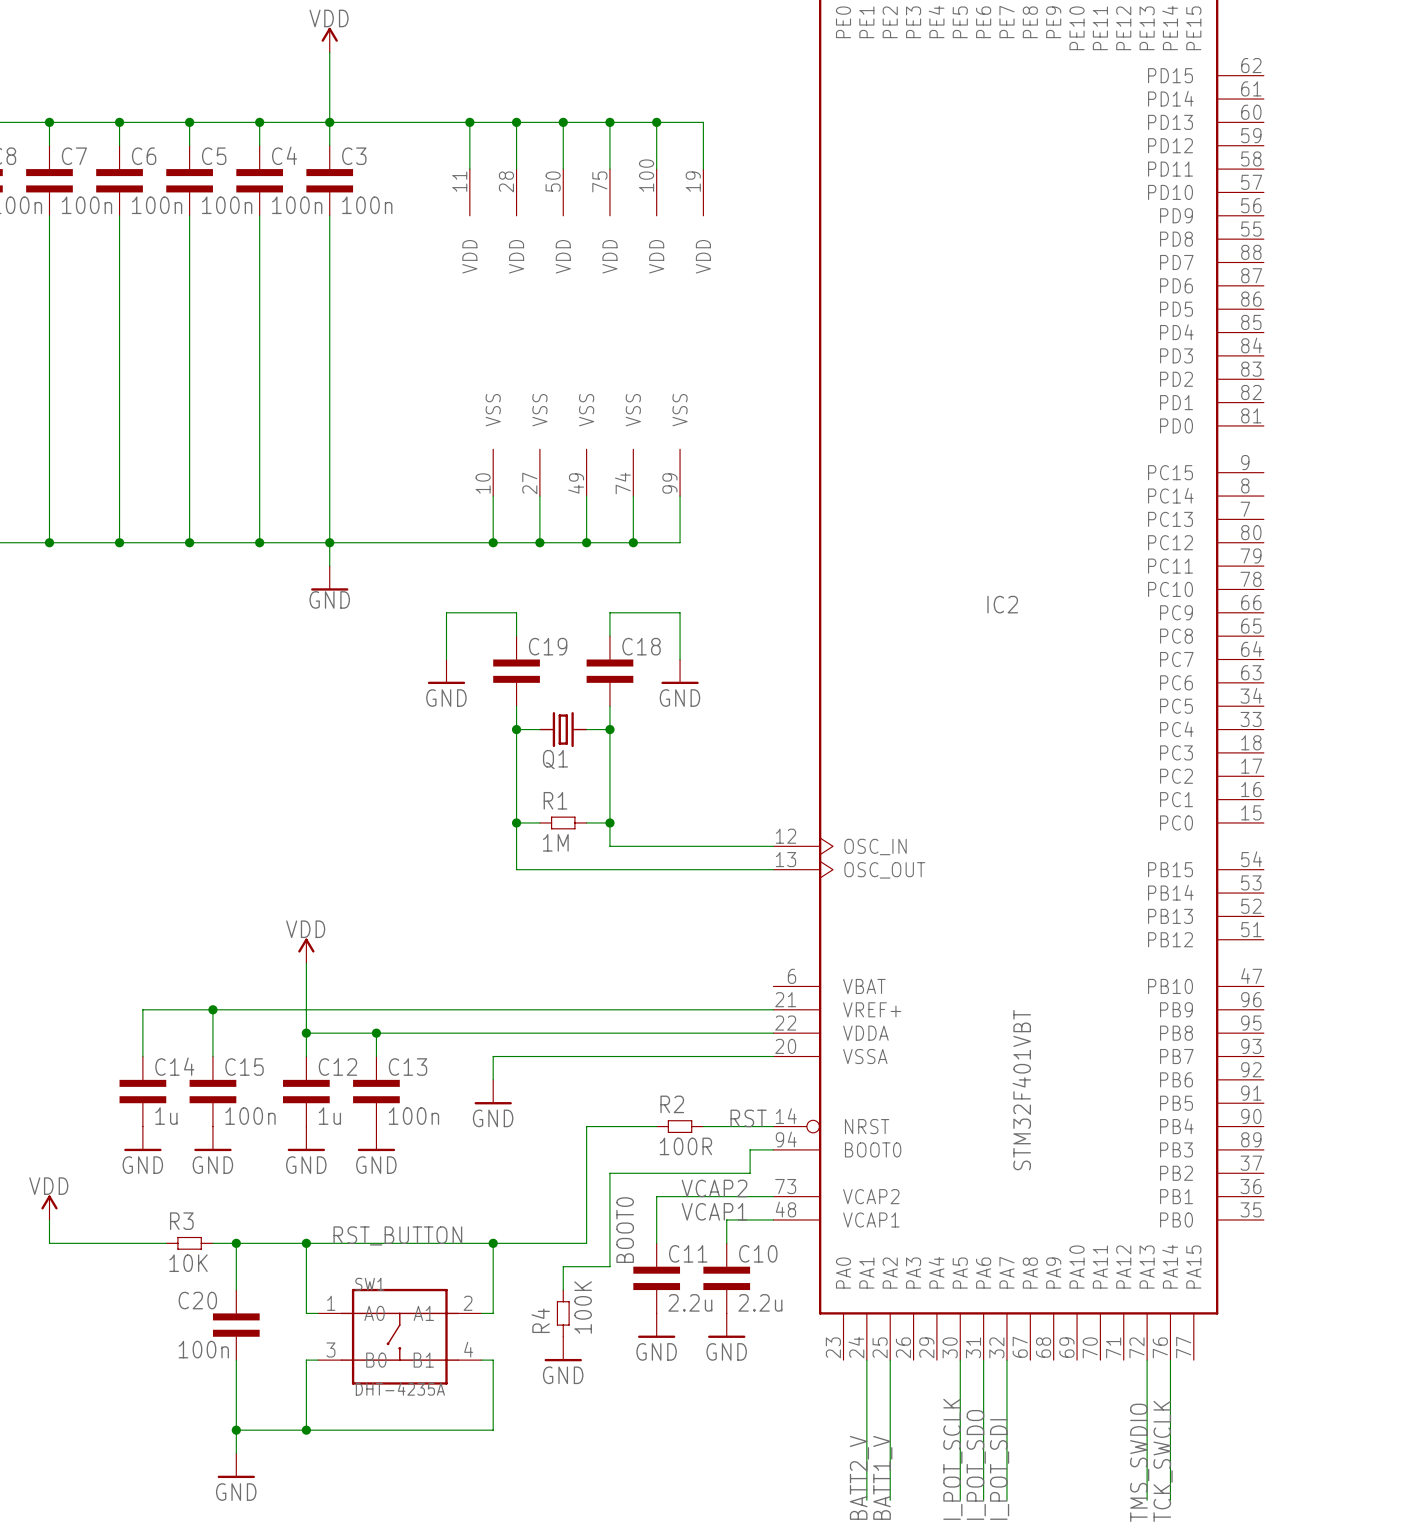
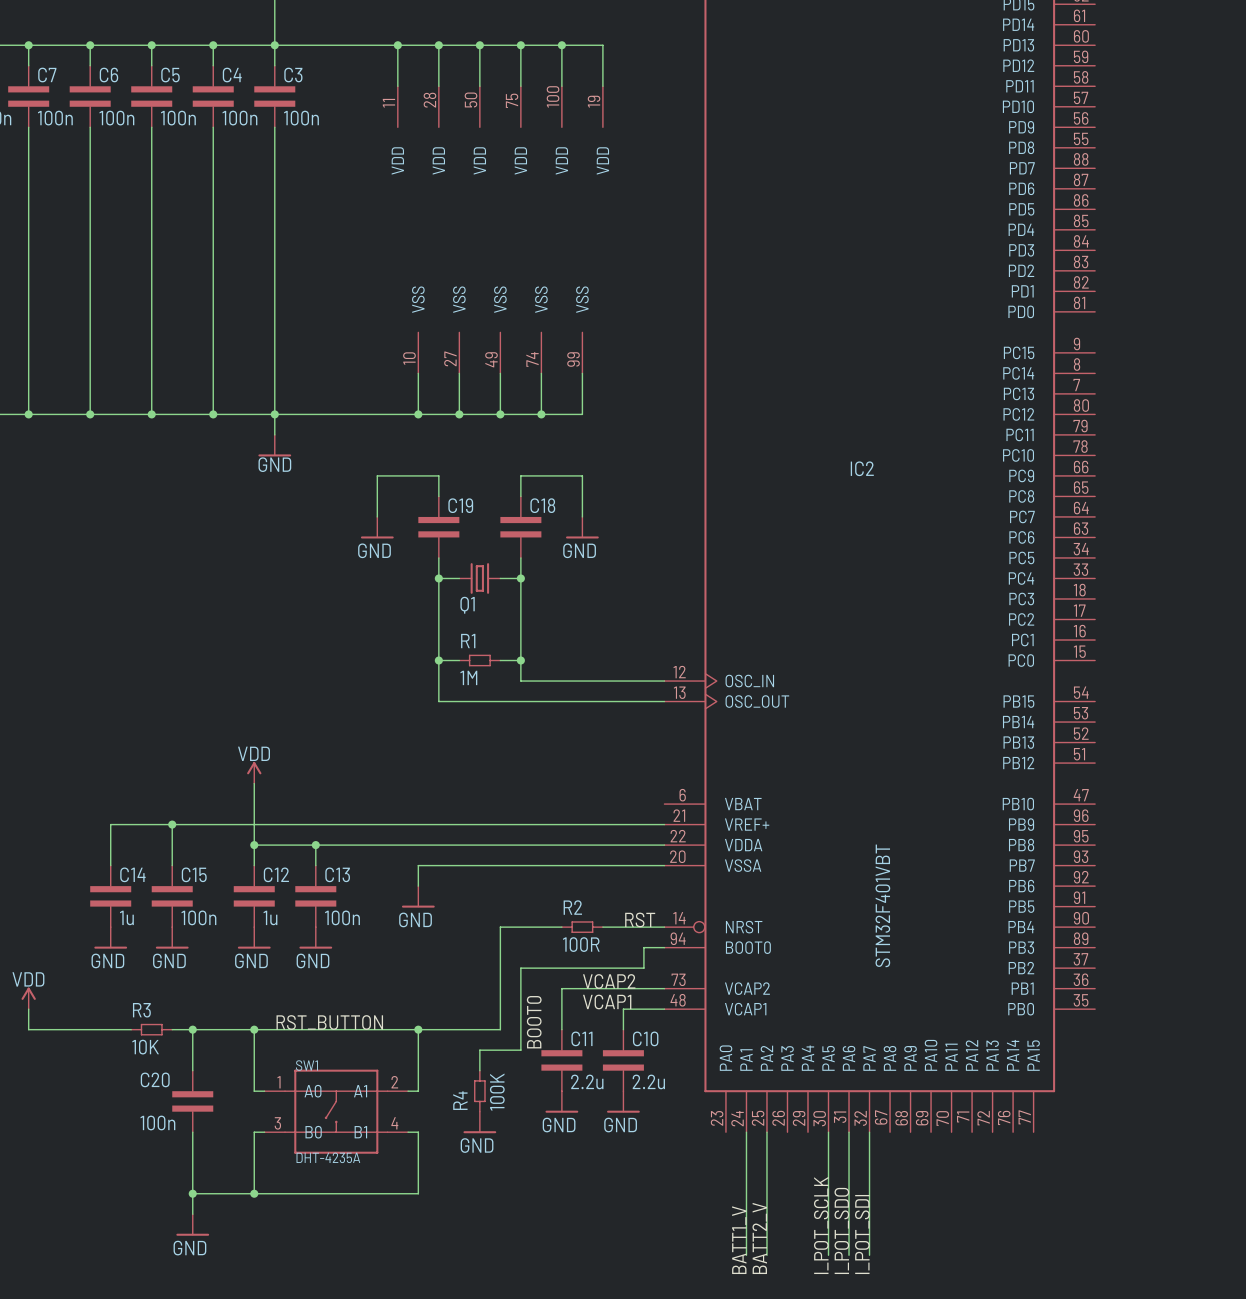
wire: (1147, 1360) (1147, 1500) -> none
wire: (1170, 1360) (1170, 1500) -> none
label: TCK_SWCLK (1163, 1461) -> none
label: TMS_SWDIO (1139, 1462) -> none
label: BATT2_V (859, 1477) -> BATT1_V (739, 1240)
label: BATT1_V (882, 1477) -> BATT2_V (759, 1238)

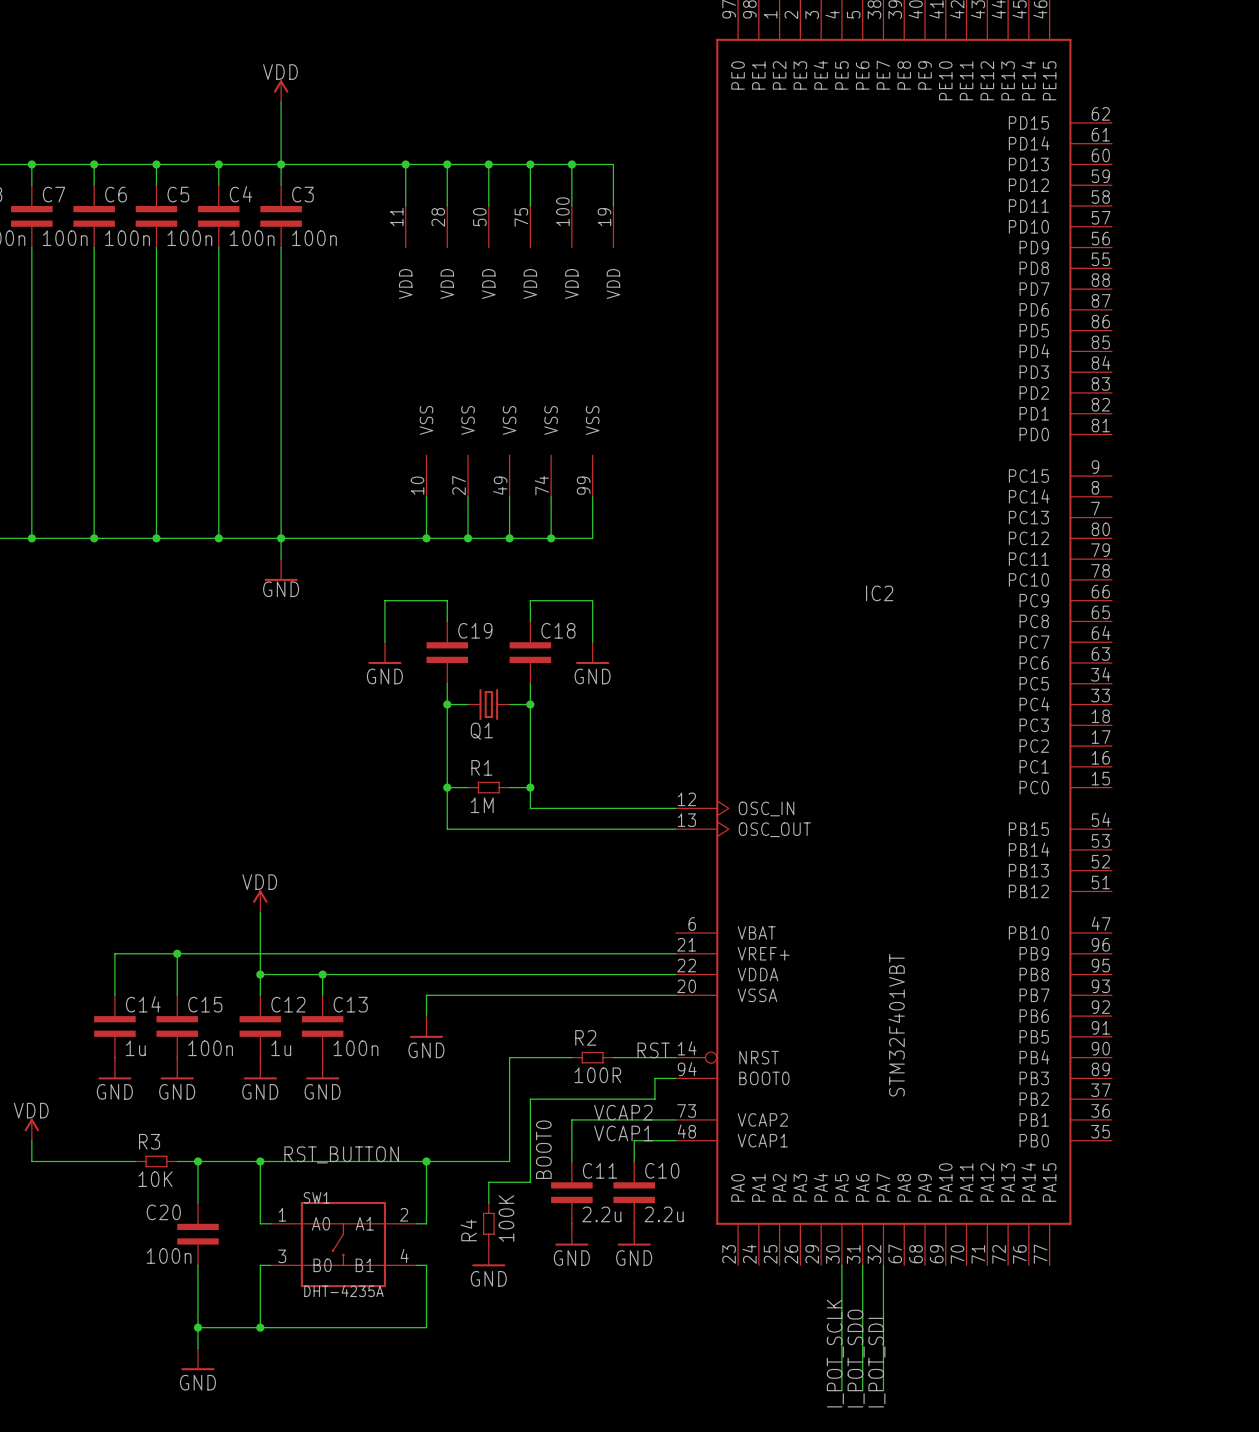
wire: (746, 1132) (746, 1255) -> none
wire: (766, 1132) (766, 1255) -> none
label: BATT2_V (759, 1238) -> none
label: BATT1_V (739, 1240) -> none

